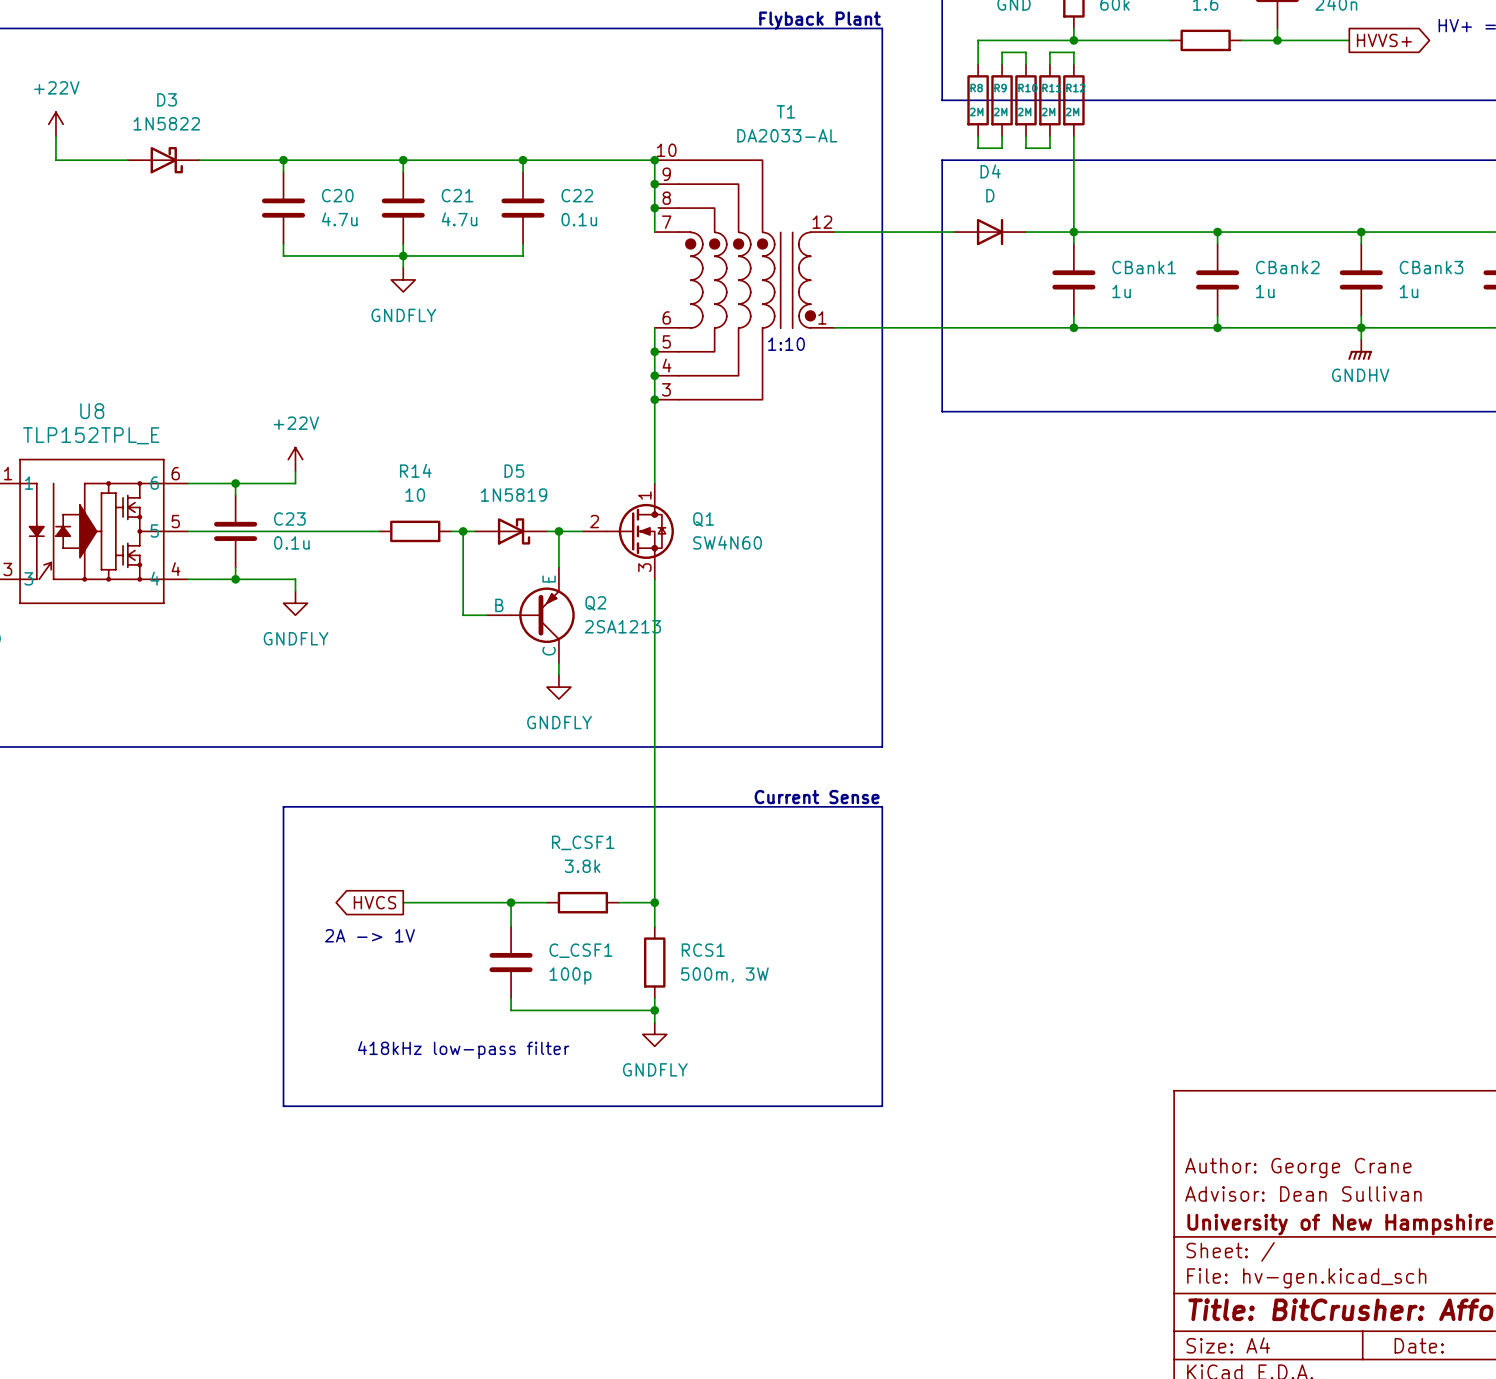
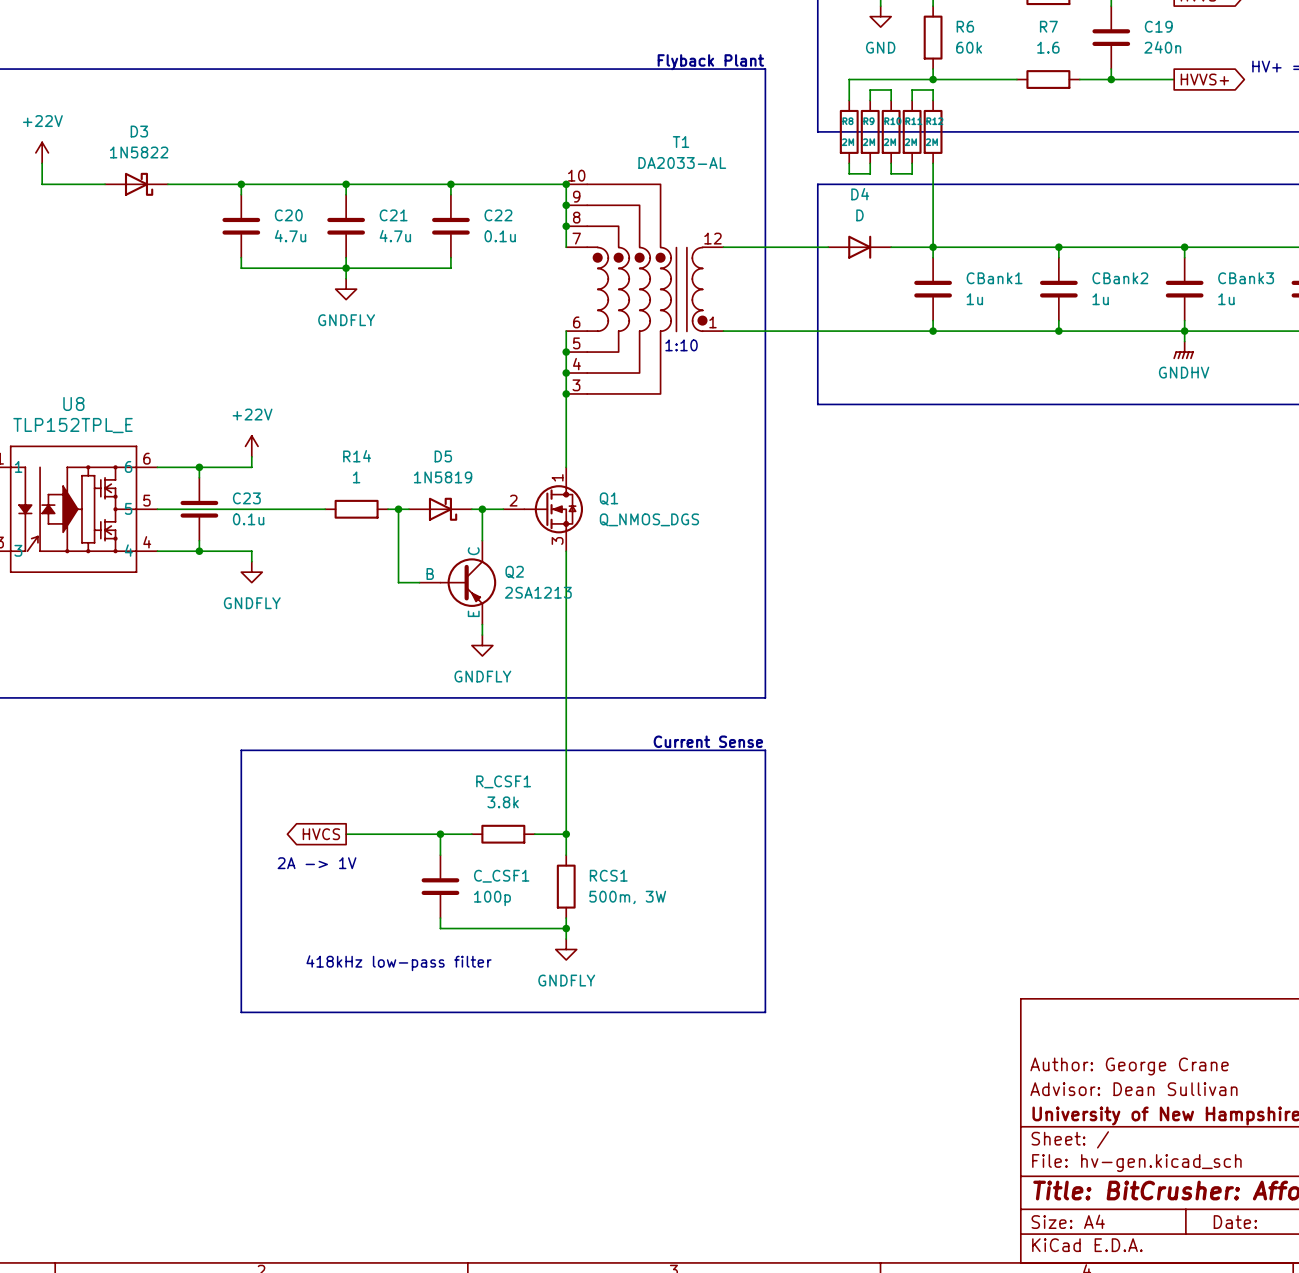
R14 value: 10 (415, 495) -> 1 (356, 477)
Q1 value: SW4N60 (727, 542) -> Q_NMOS_DGS (649, 519)
Q2 flip: as is (542, 615) -> up-down (468, 582)

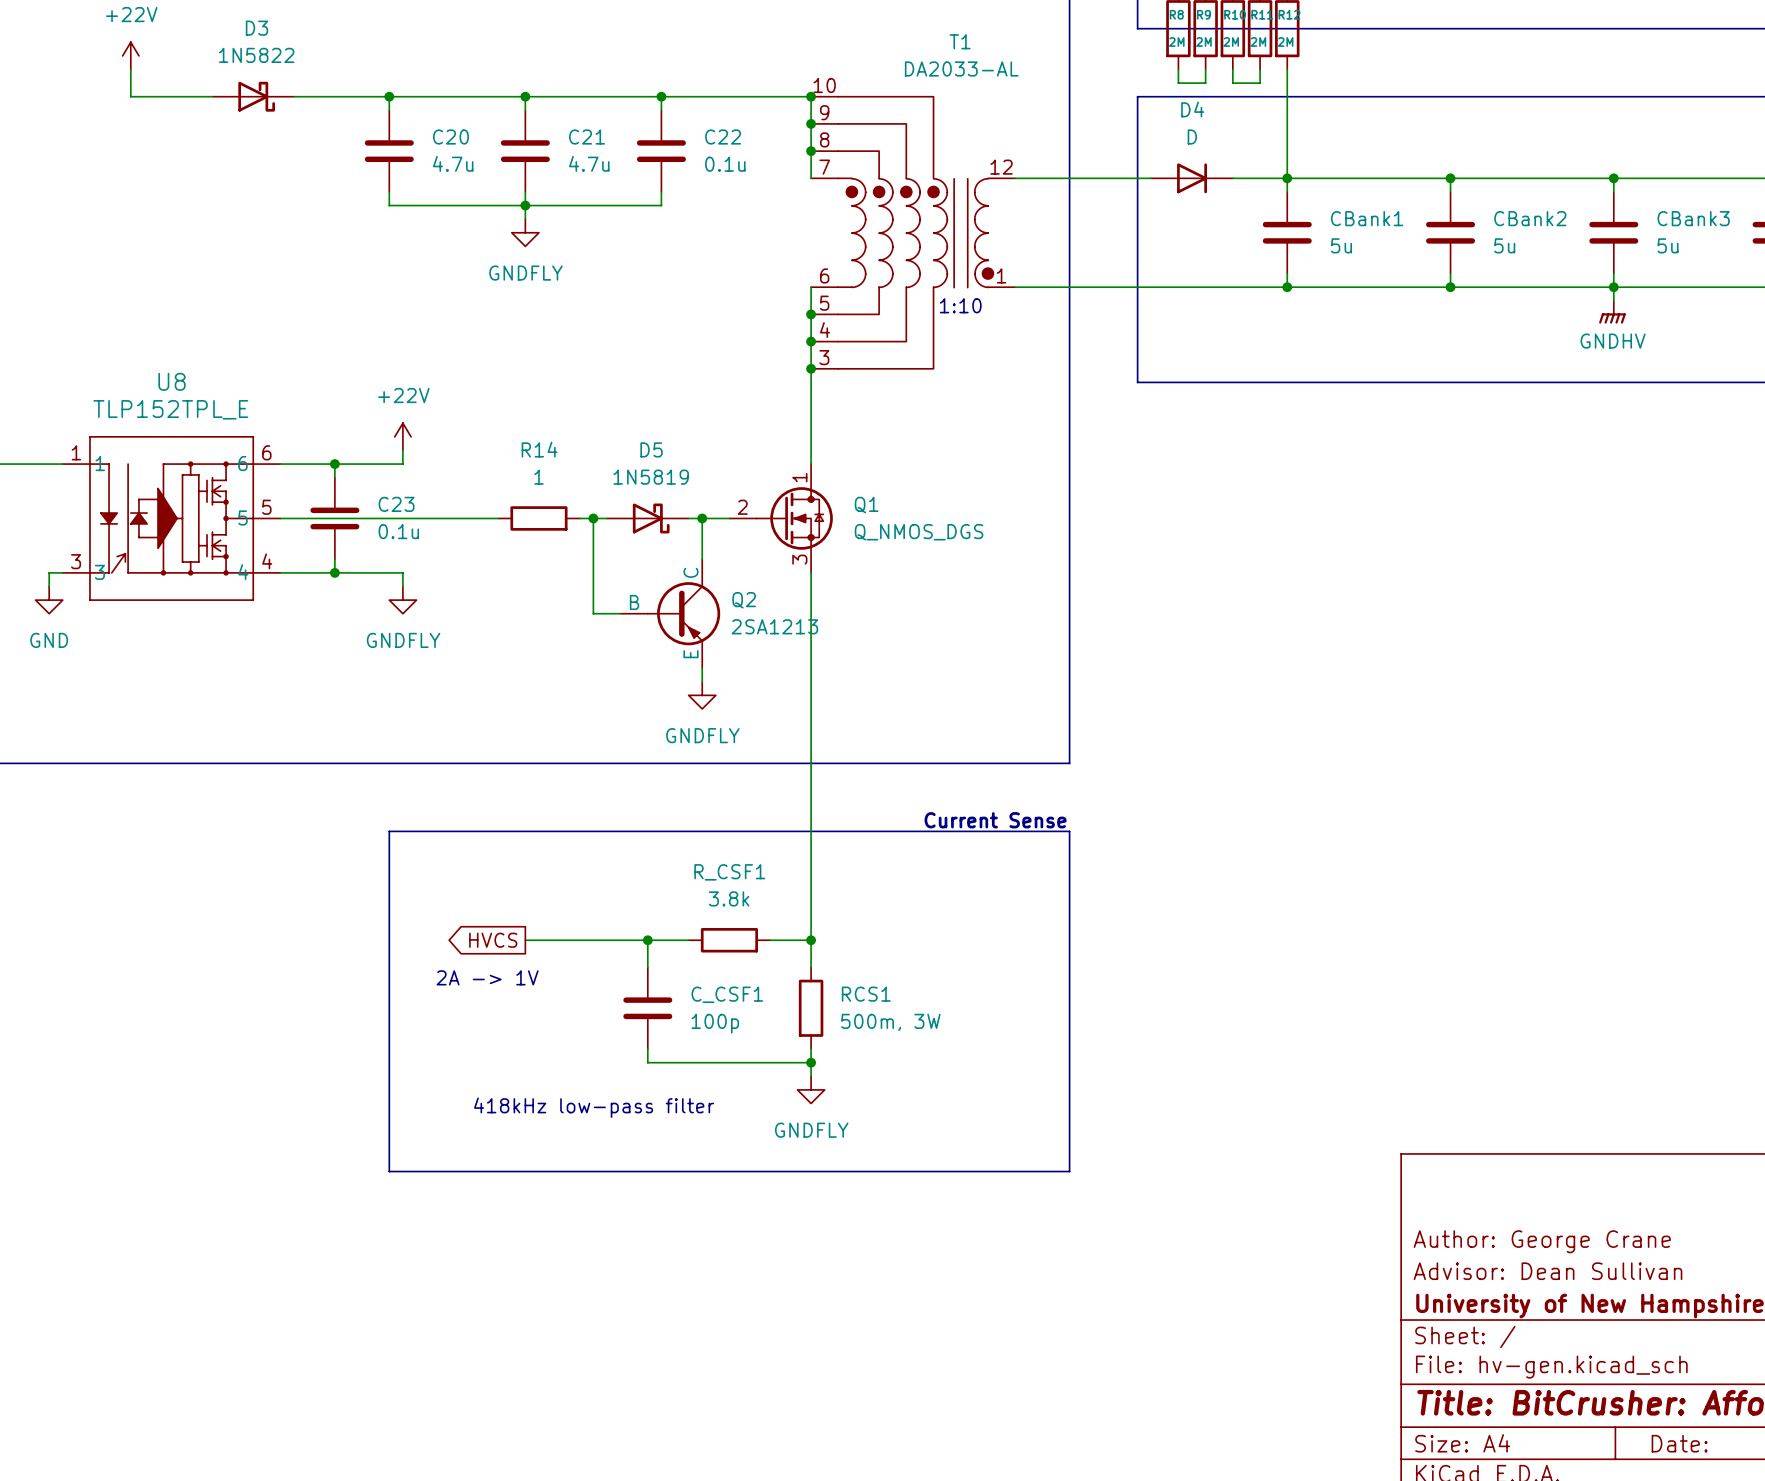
CBank1 value: 1u (974, 299) -> 5u (1341, 245)
CBank2 value: 1u (1100, 299) -> 5u (1504, 245)
CBank3 value: 1u (1226, 299) -> 5u (1668, 245)

